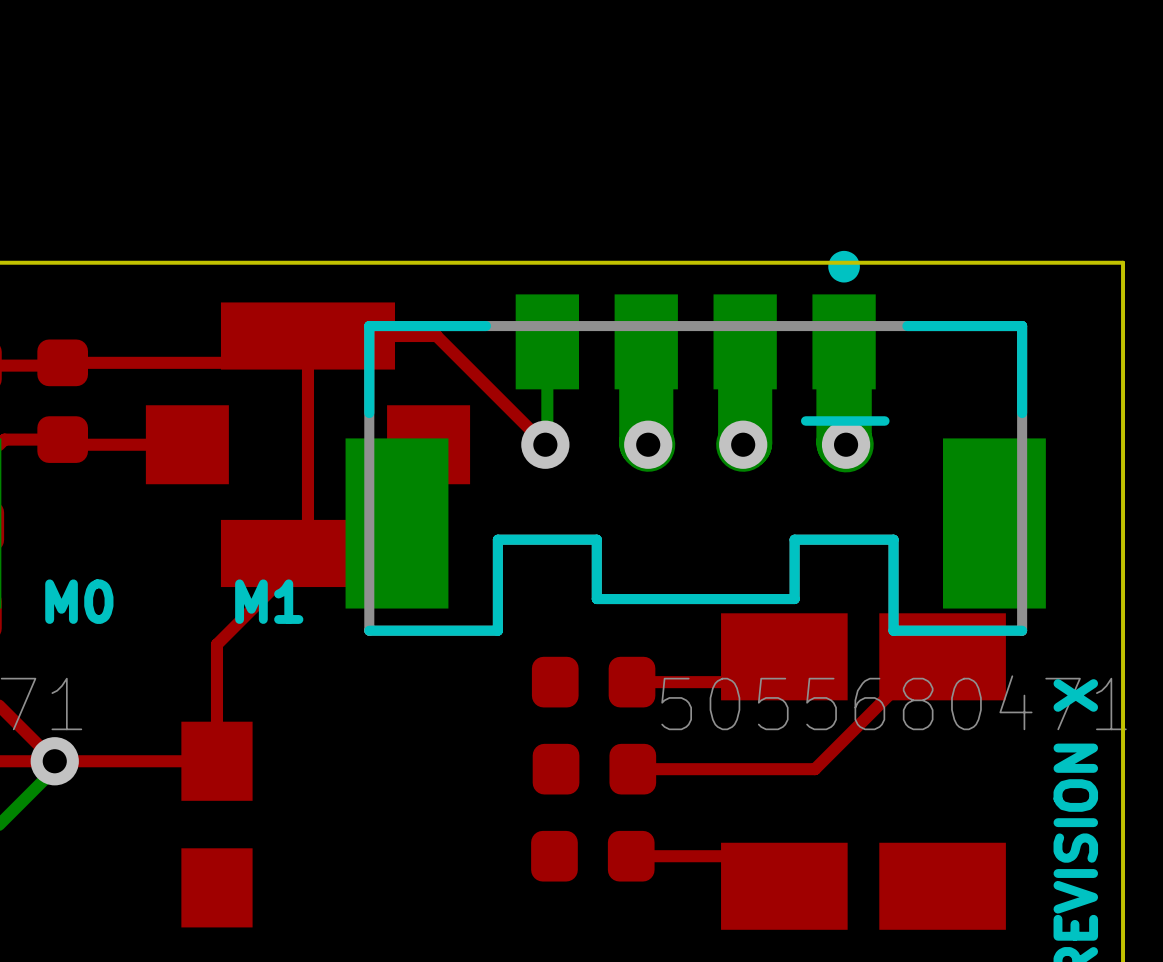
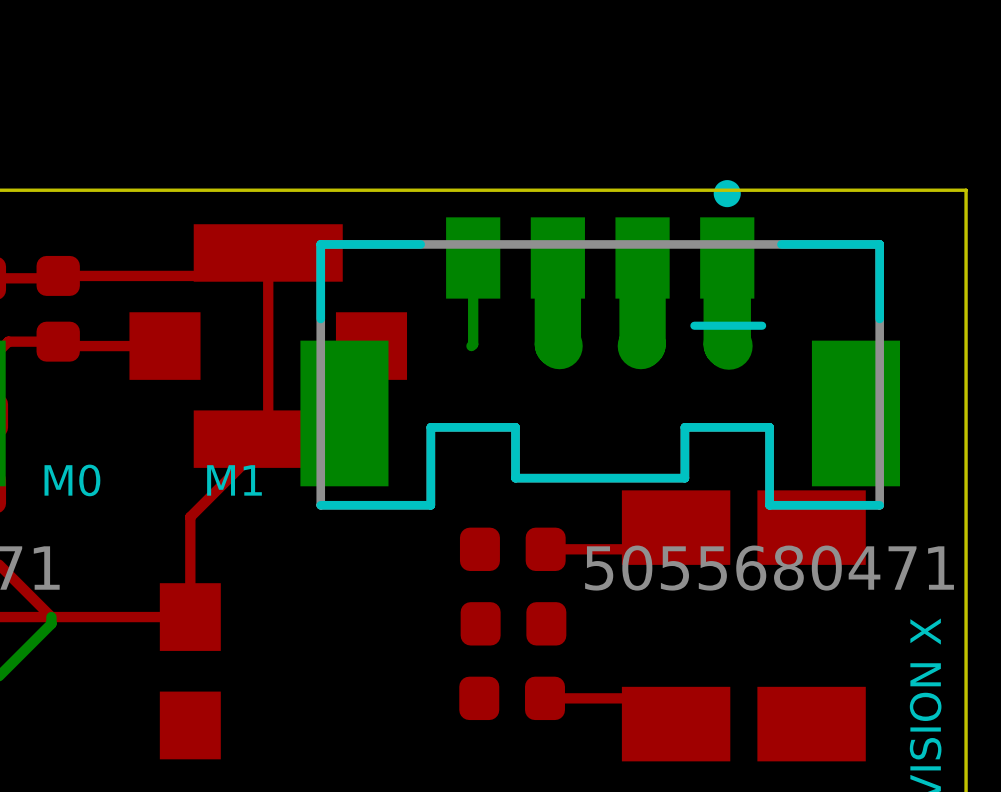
top track: (307, 336) (436, 336) (545, 444) -> none
via: (545, 444) -> none
via: (648, 444) -> none
via: (743, 444) -> none
via: (846, 444) -> none
top track: (942, 656) (927, 656) (814, 769) (632, 769) -> none
via: (54, 761) -> none

